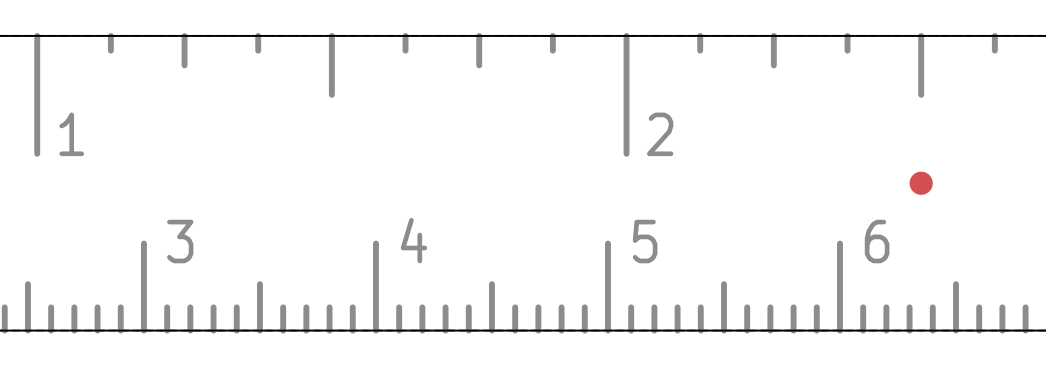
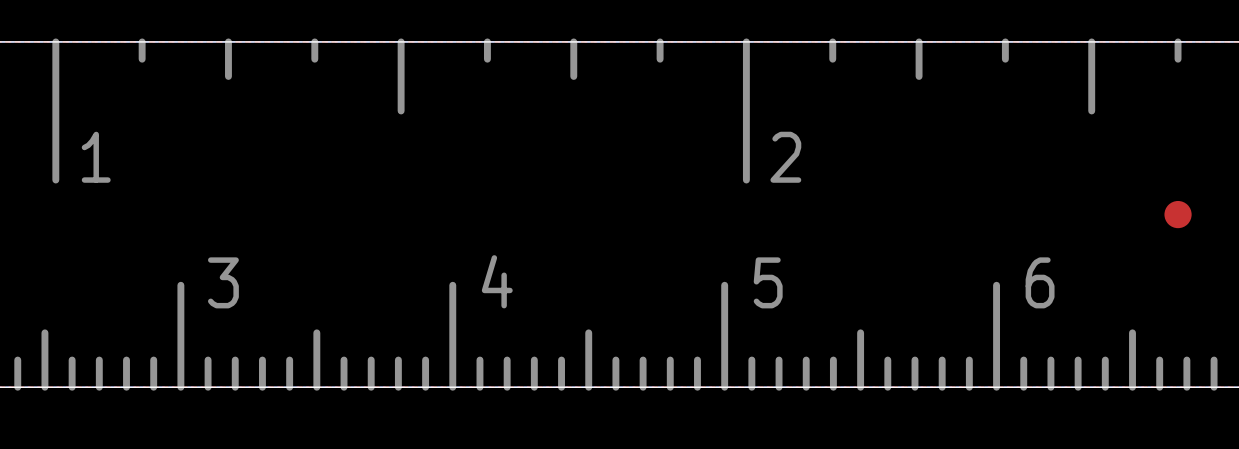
part position: (921, 183) -> (1178, 214)

